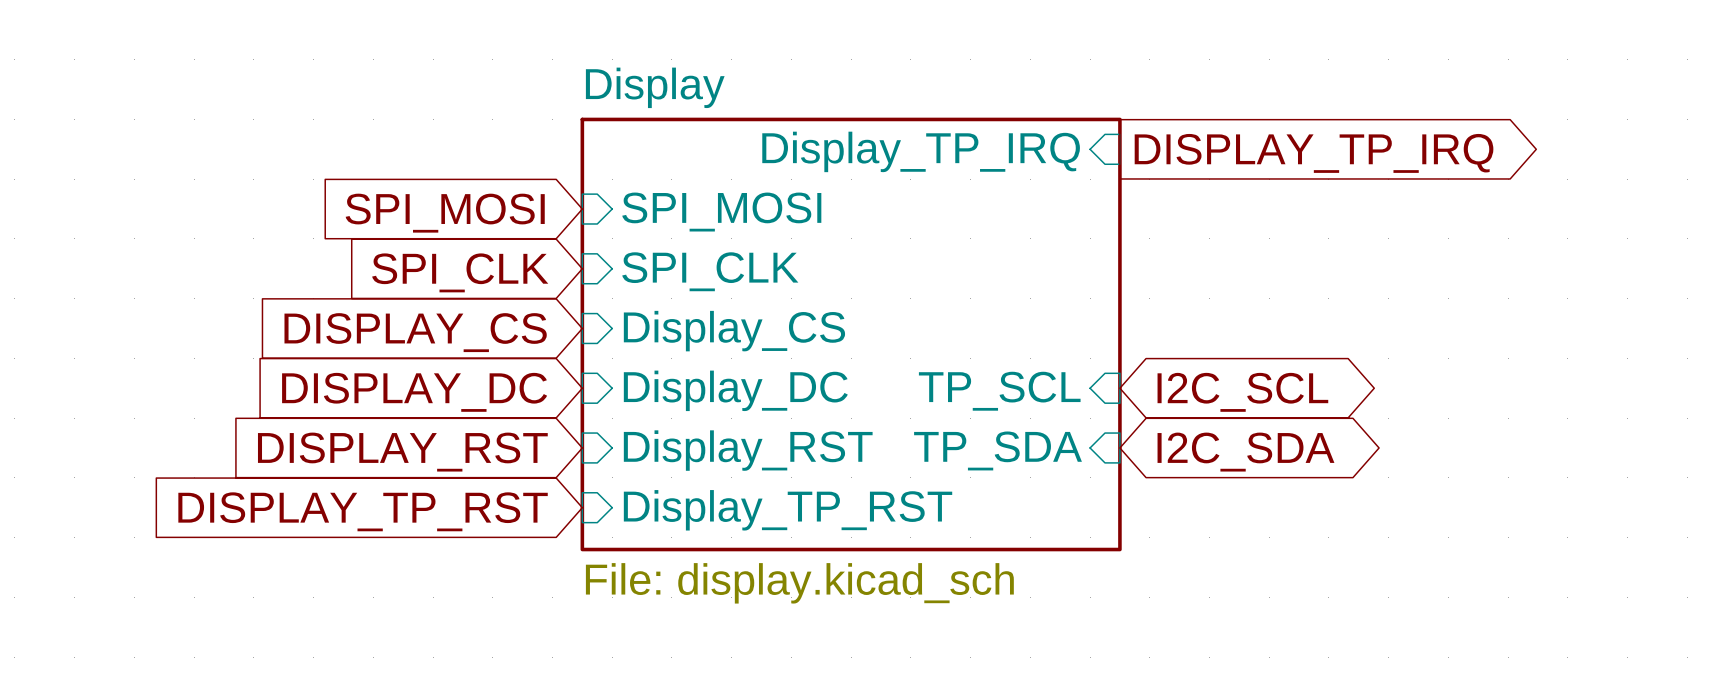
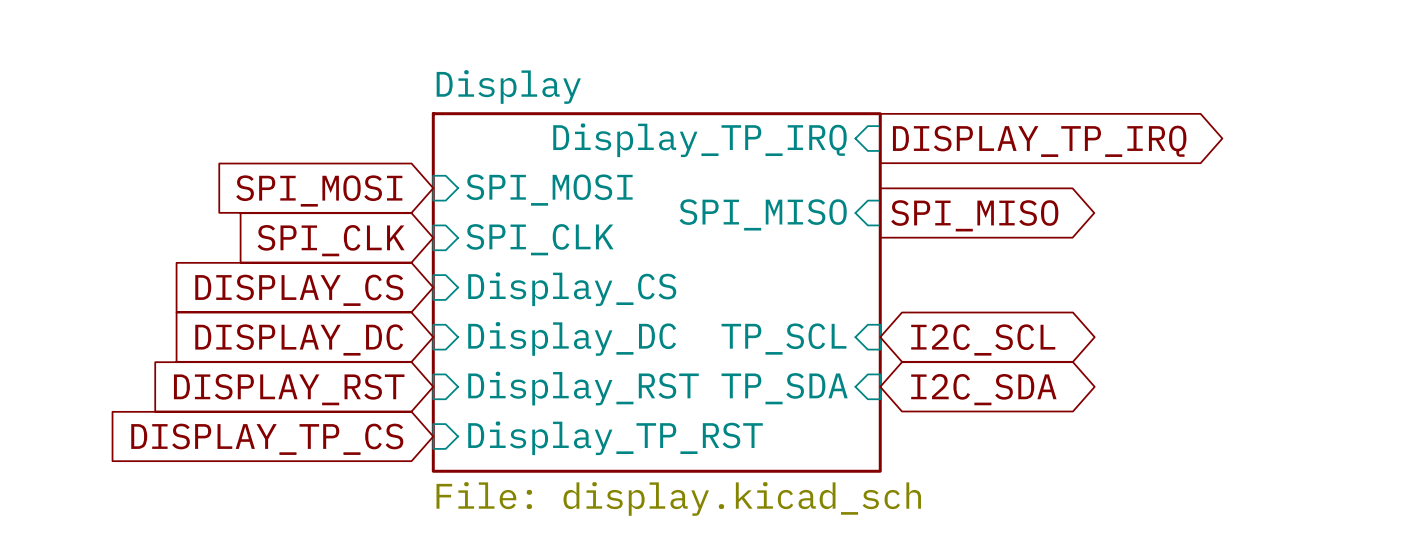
sheet pin: none -> SPI_MISO (763, 214)
global label: none -> SPI_MISO (974, 215)
global label: DISPLAY_TP_RST (363, 511) -> DISPLAY_TP_CS (267, 439)

